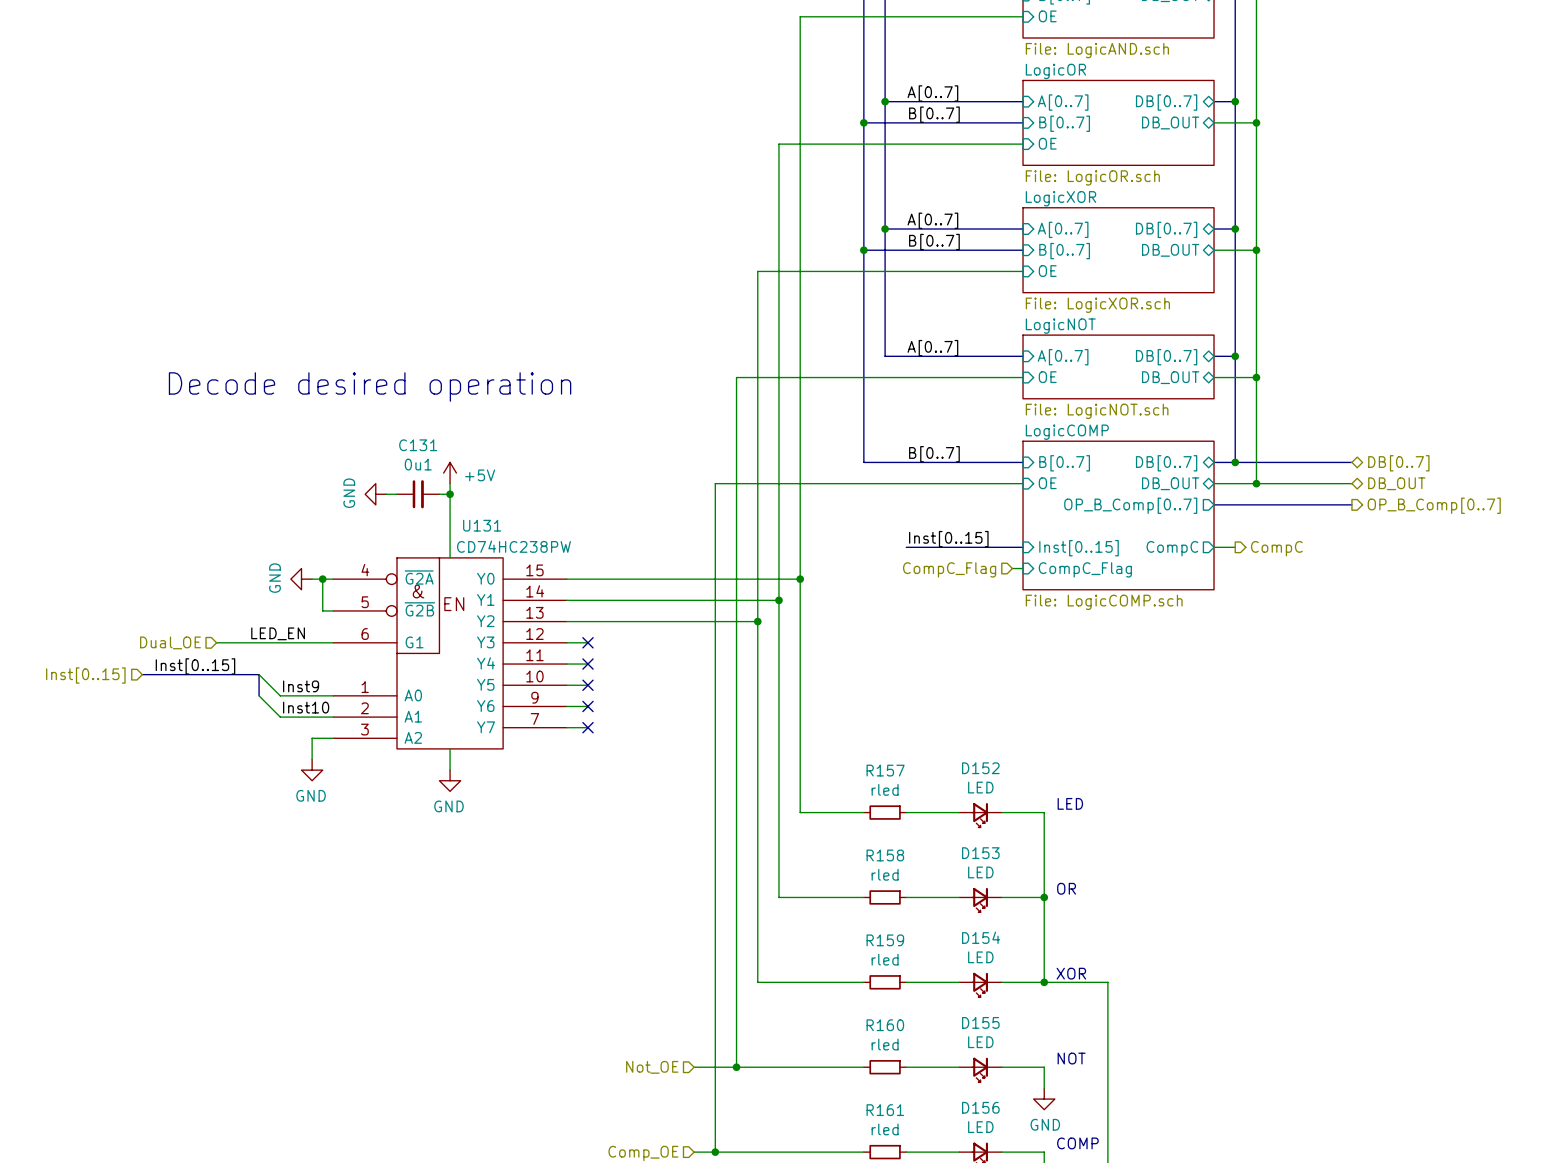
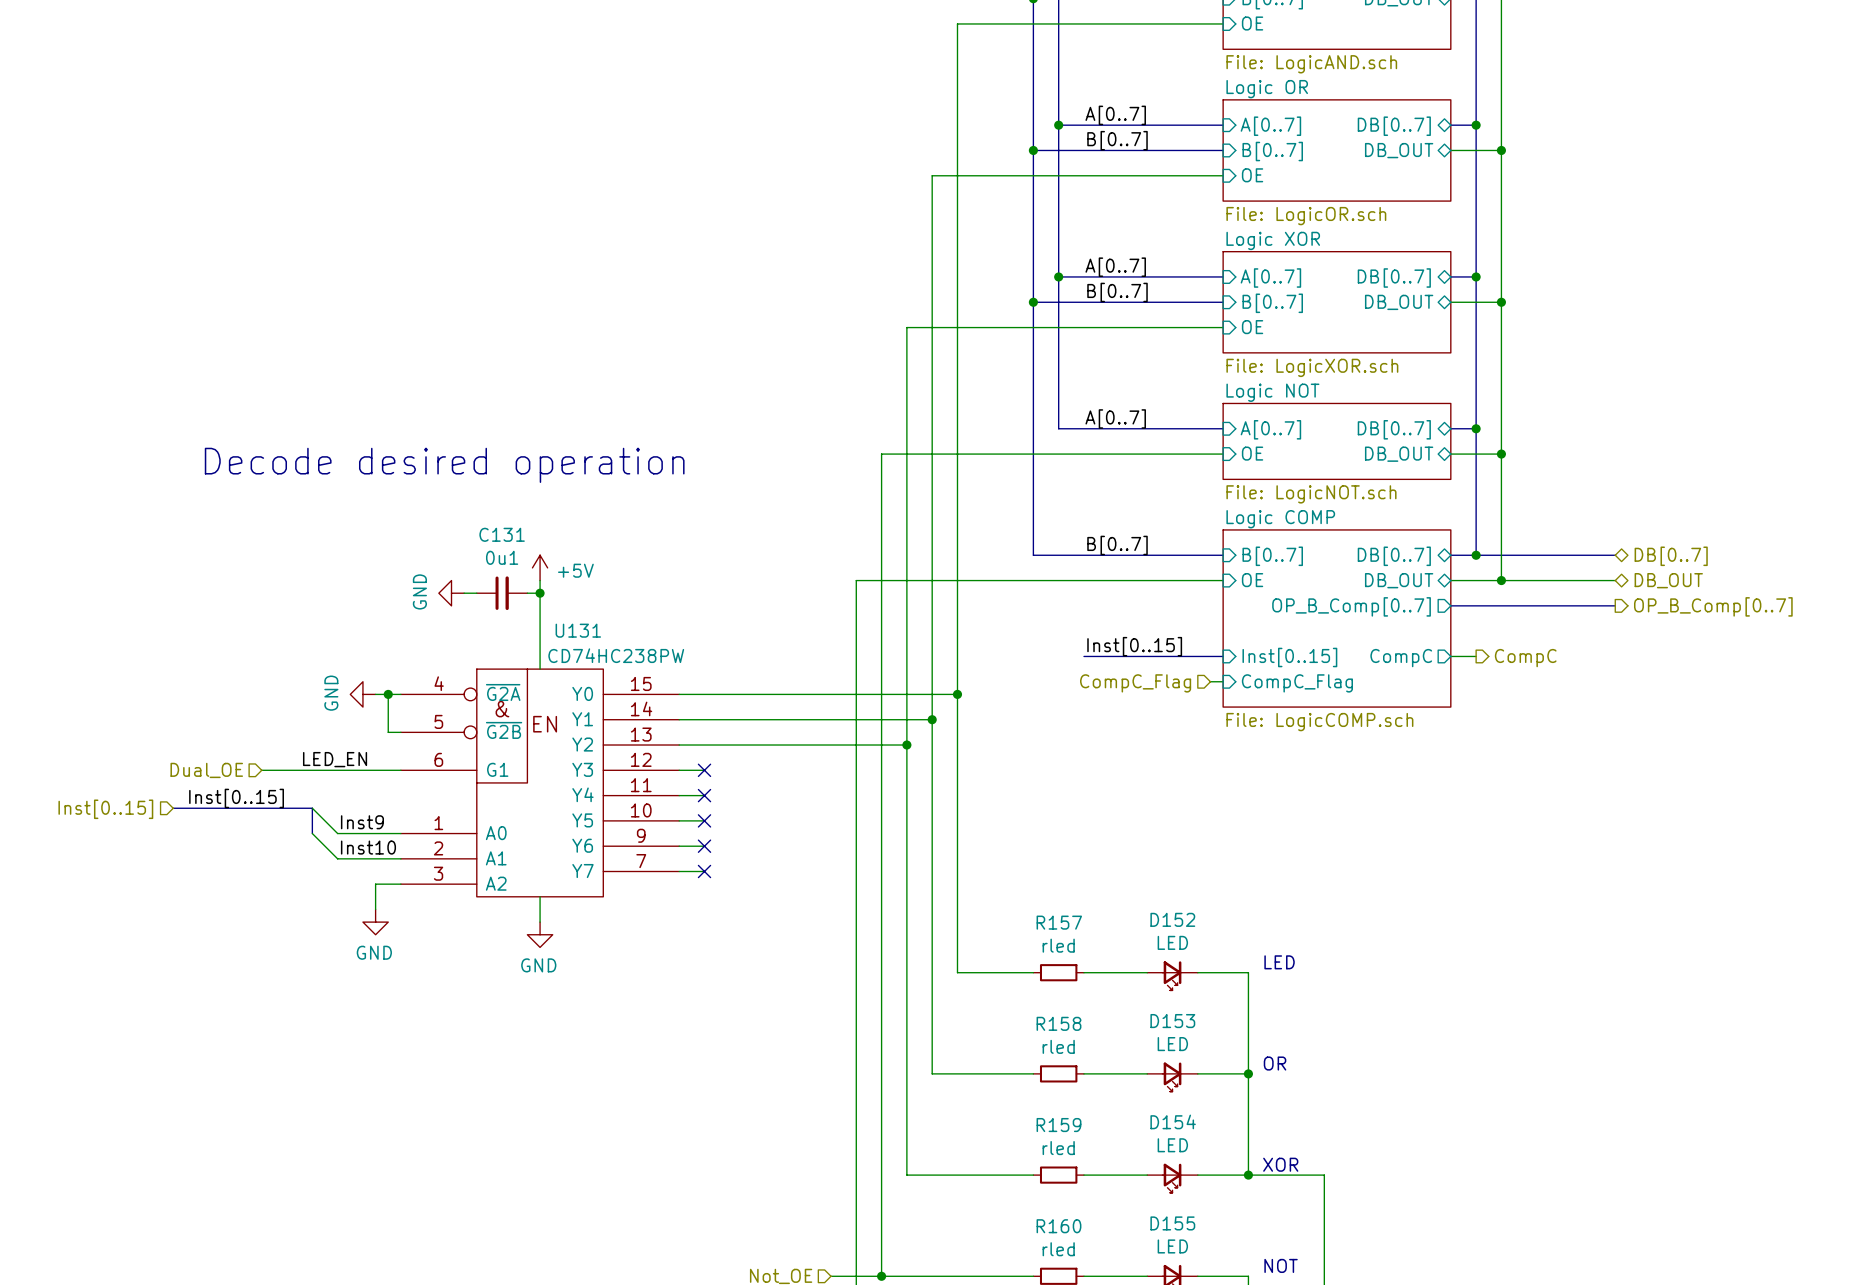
sheet LogicOR name: LogicOR (1055, 71) -> Logic OR (1267, 89)
sheet LogicXOR name: LogicXOR (1060, 198) -> Logic XOR (1273, 240)
sheet LogicNOT name: LogicNOT (1060, 326) -> Logic NOT (1272, 392)
sheet LogicCOMP name: LogicCOMP (1067, 432) -> Logic COMP (1280, 519)

